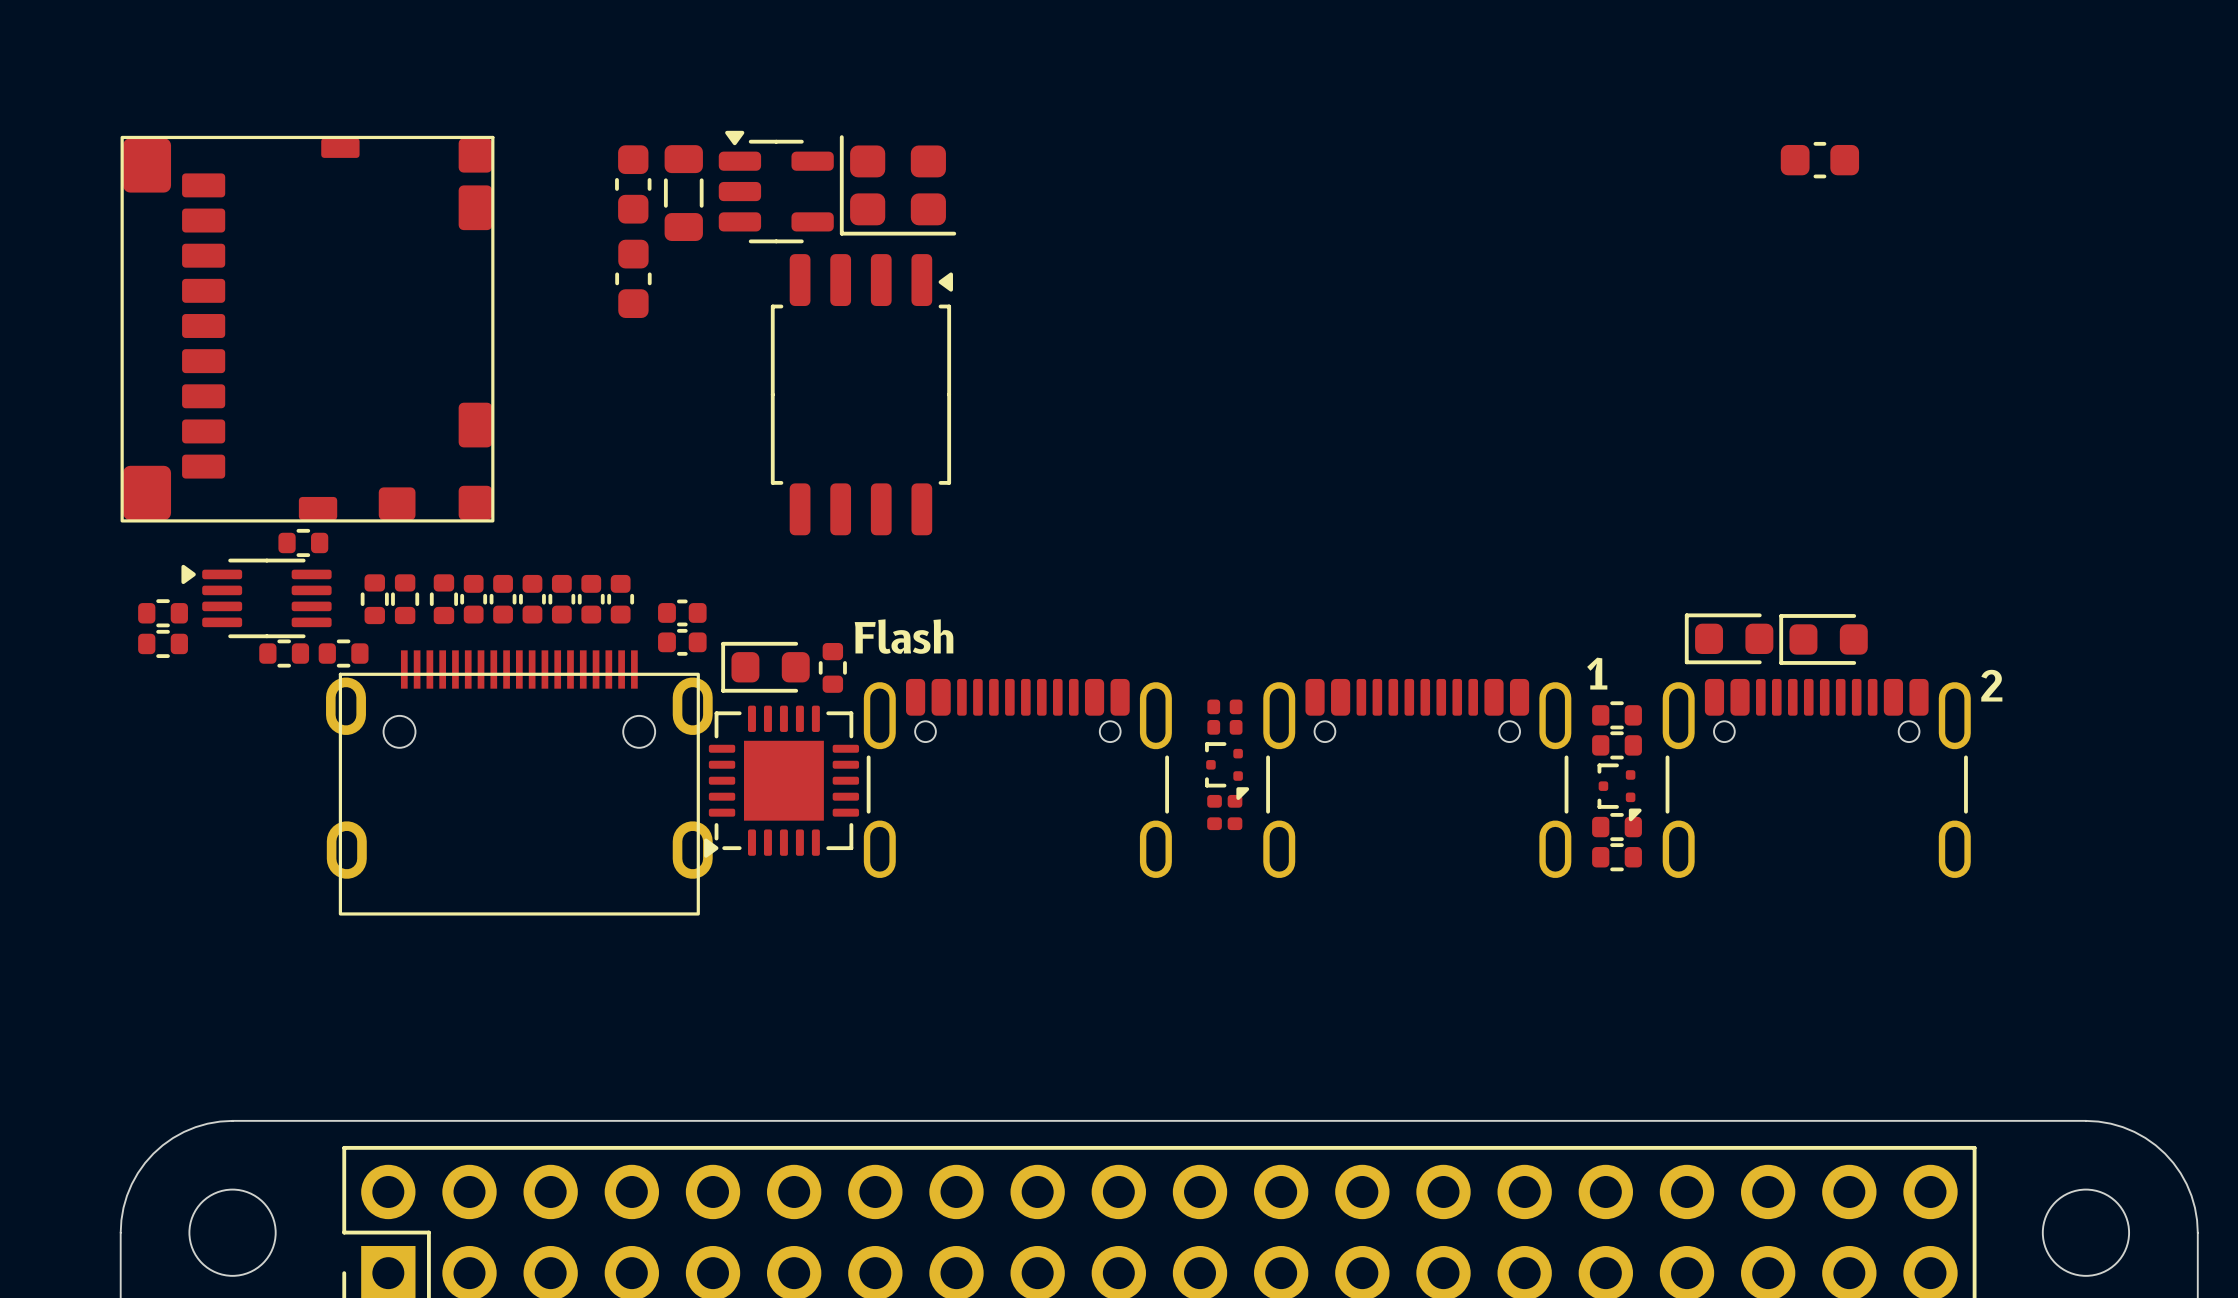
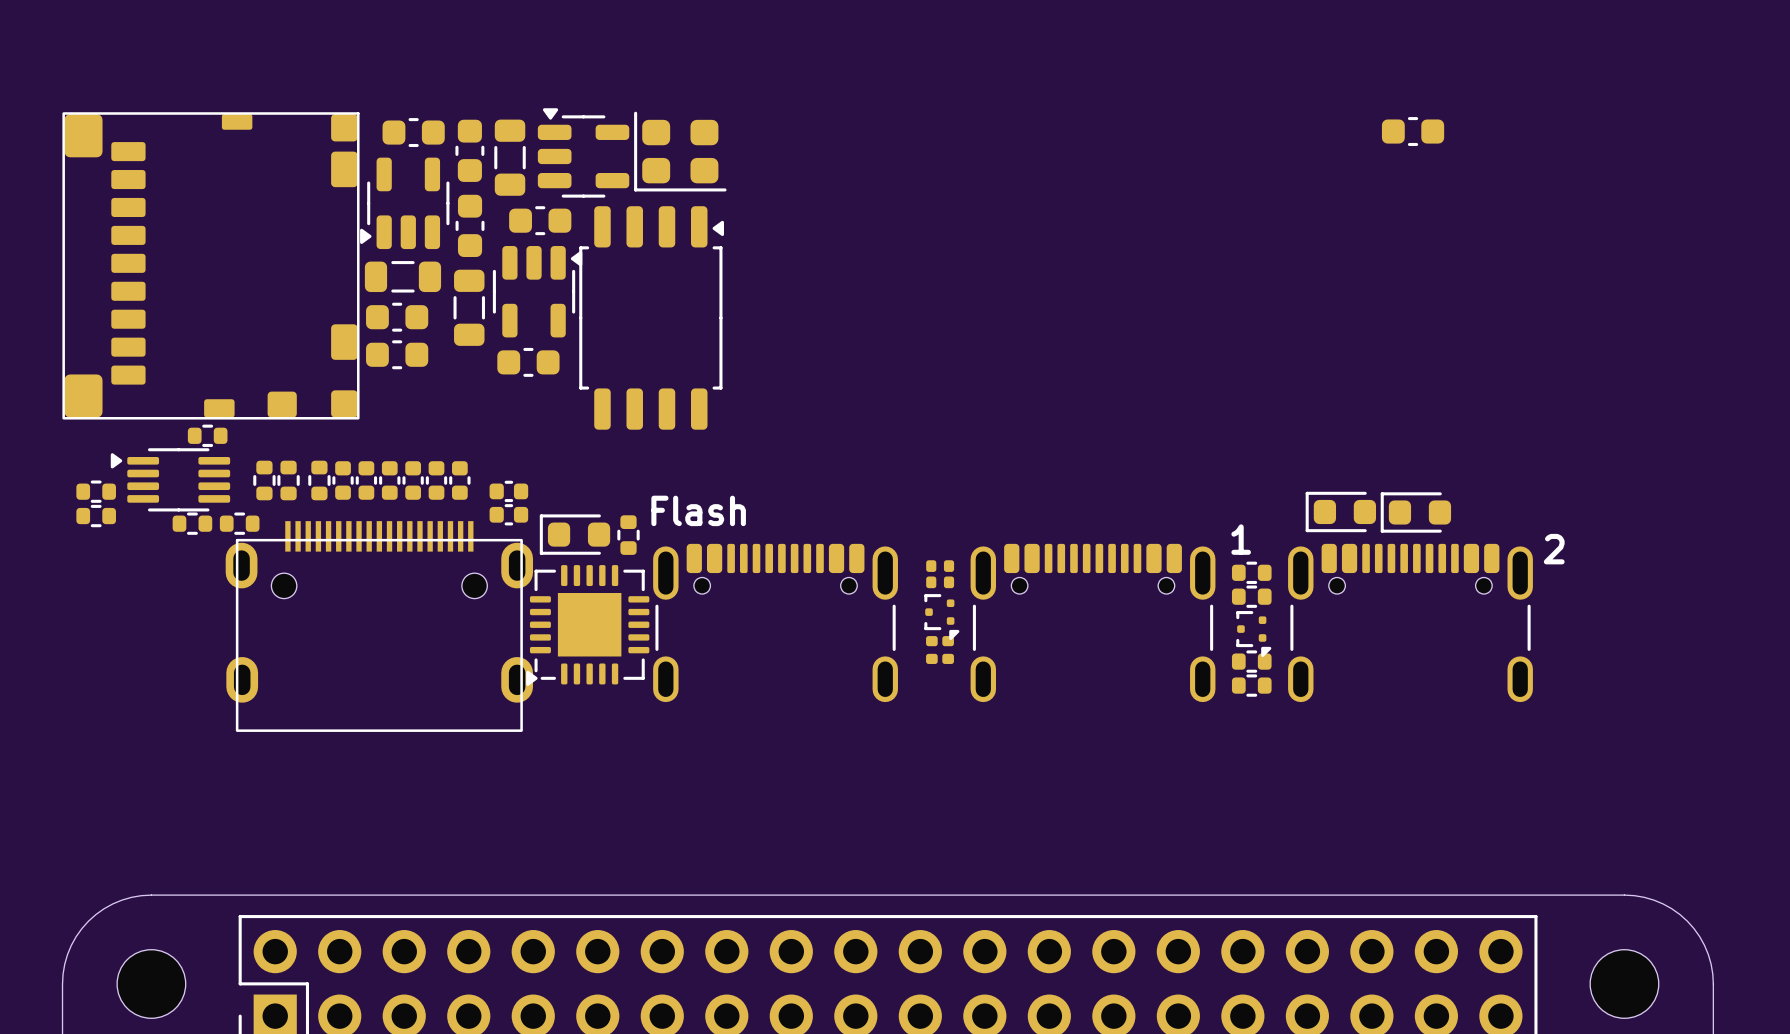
part: none -> (413, 132)
part: none -> (404, 203)
part: none -> (540, 220)
part: none -> (402, 276)
part: none -> (537, 291)
part: none -> (469, 307)
part: none -> (397, 317)
part: none -> (397, 354)
part: none -> (528, 362)

